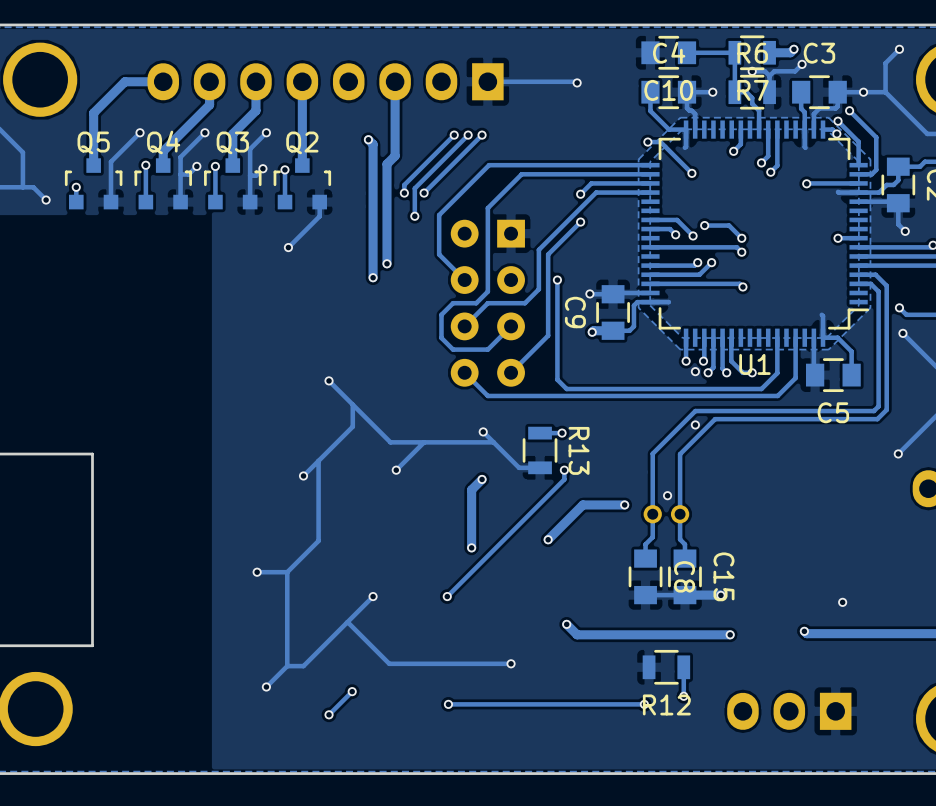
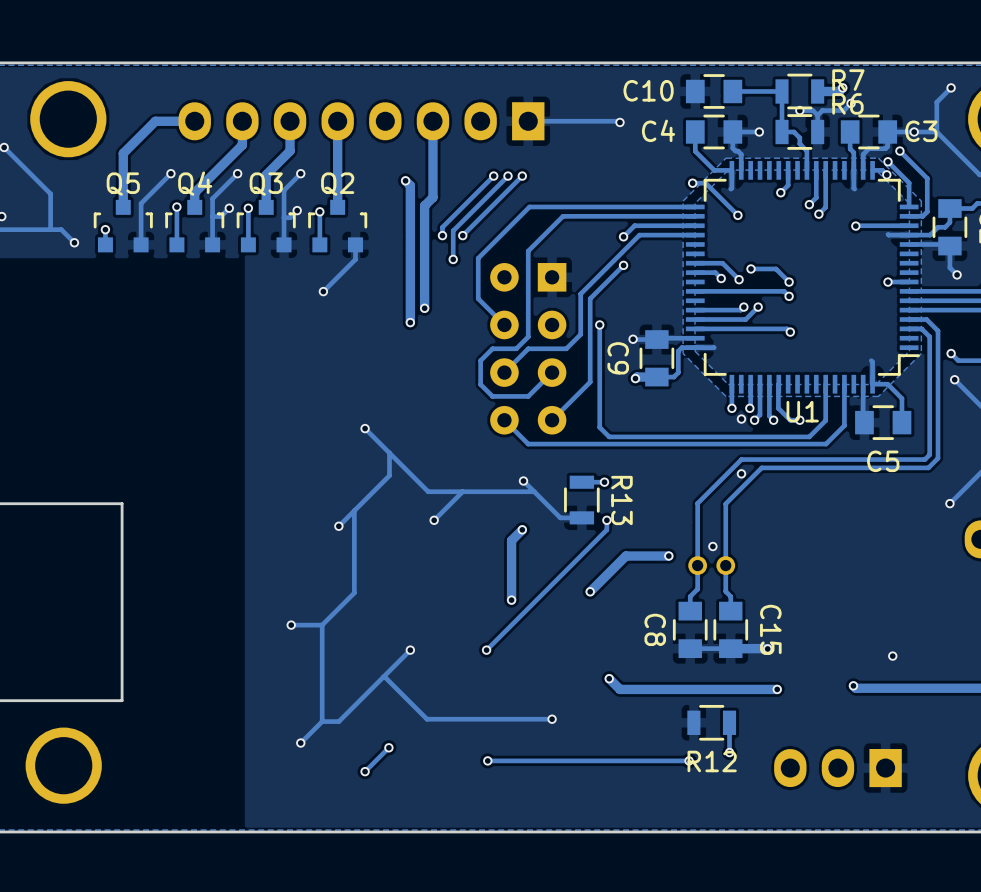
C4 name position: C4 (669, 52) -> C4 (658, 130)
R6 name position: R6 (752, 53) -> R6 (847, 103)
C3 name position: C3 (819, 53) -> C3 (921, 131)
C10 name position: C10 (668, 90) -> C10 (648, 90)
R7 name position: R7 (753, 90) -> R7 (848, 80)
C8 name position: C8 (684, 576) -> C8 (655, 629)

